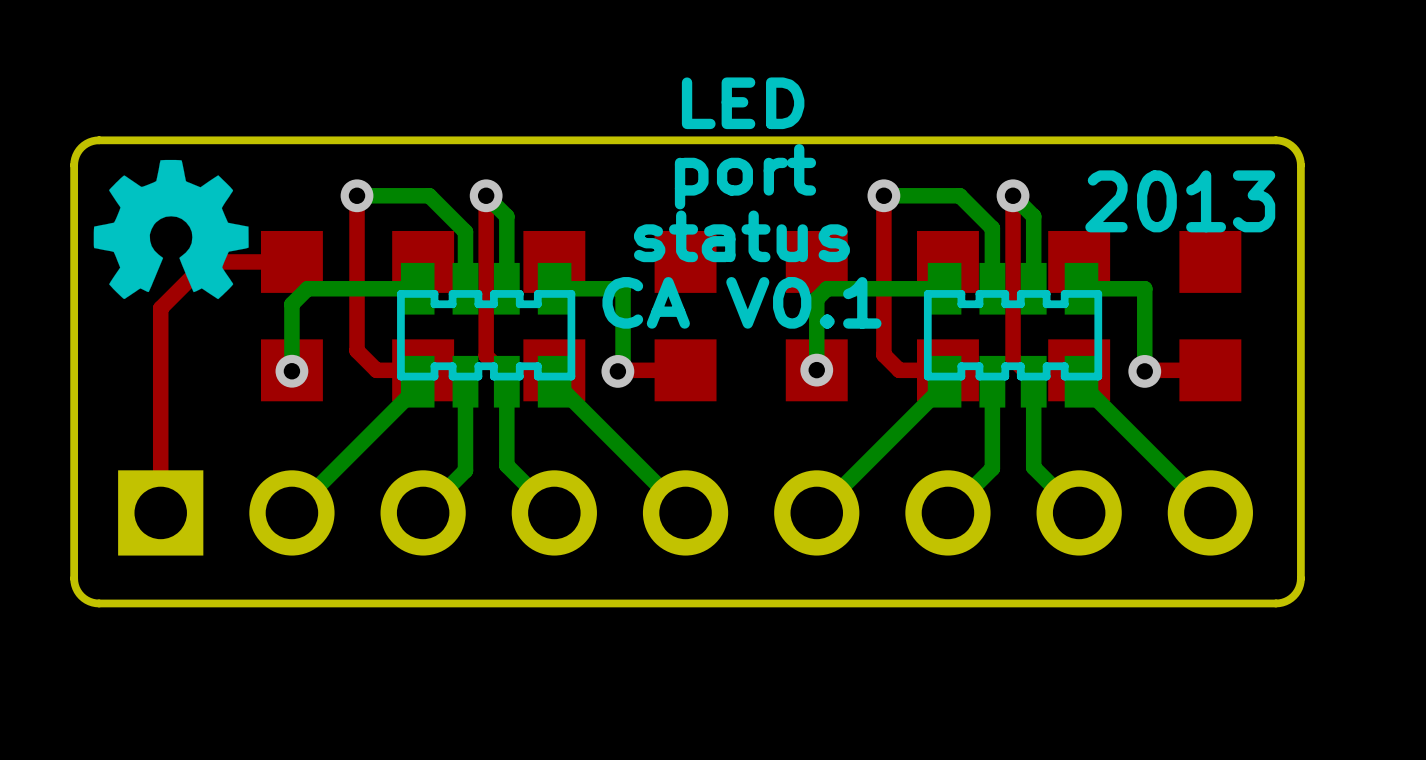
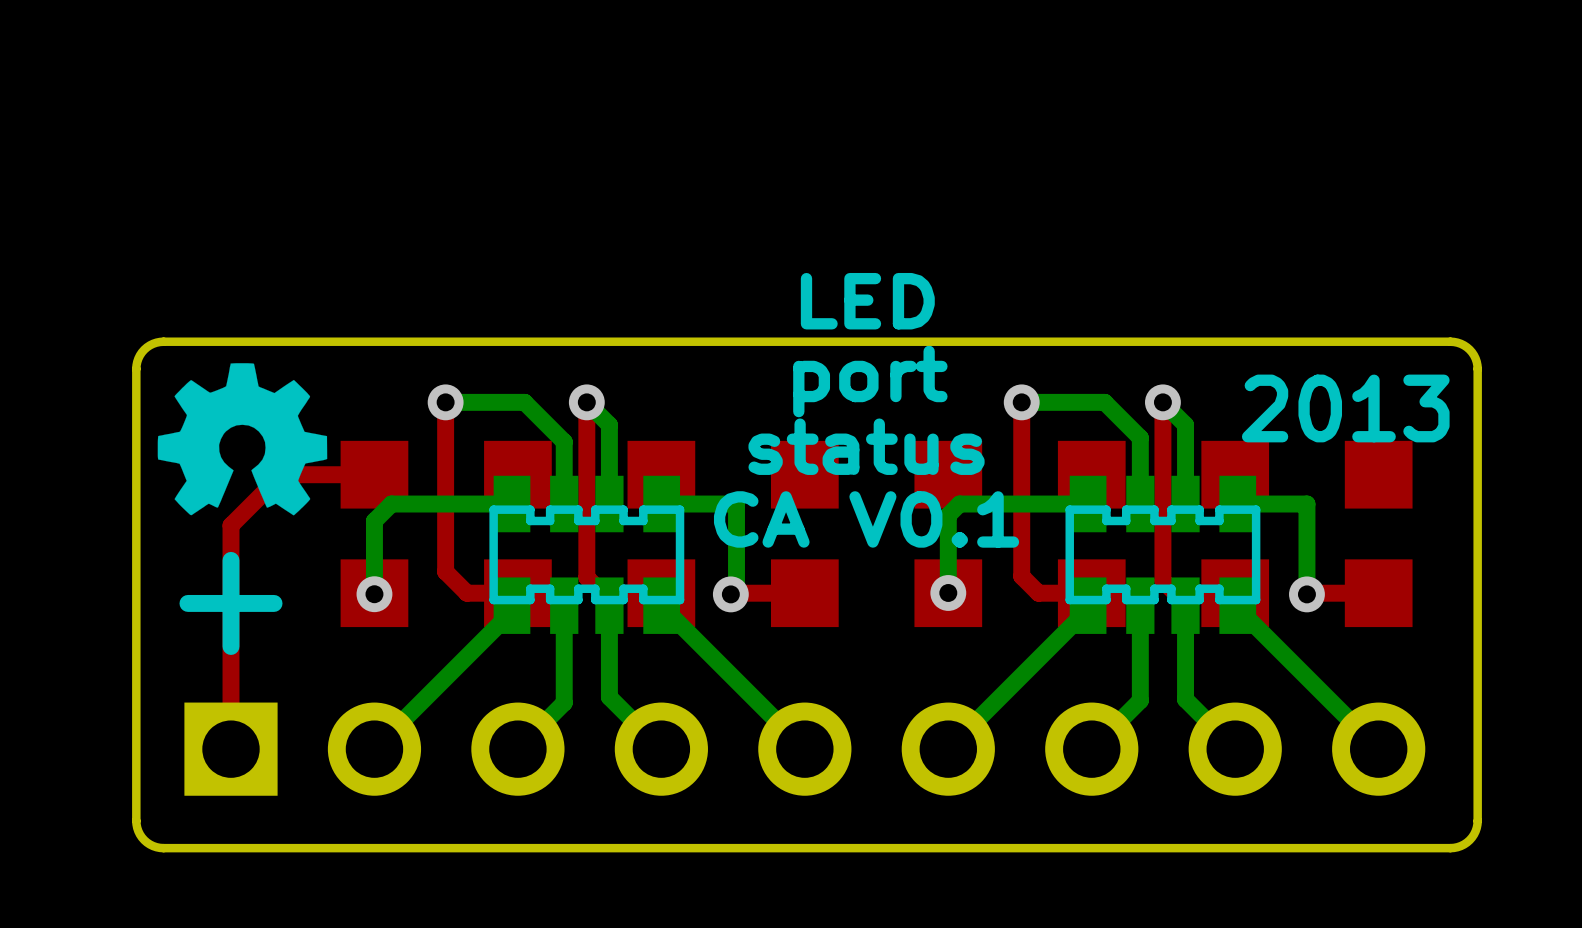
text: none -> + (231, 603)

